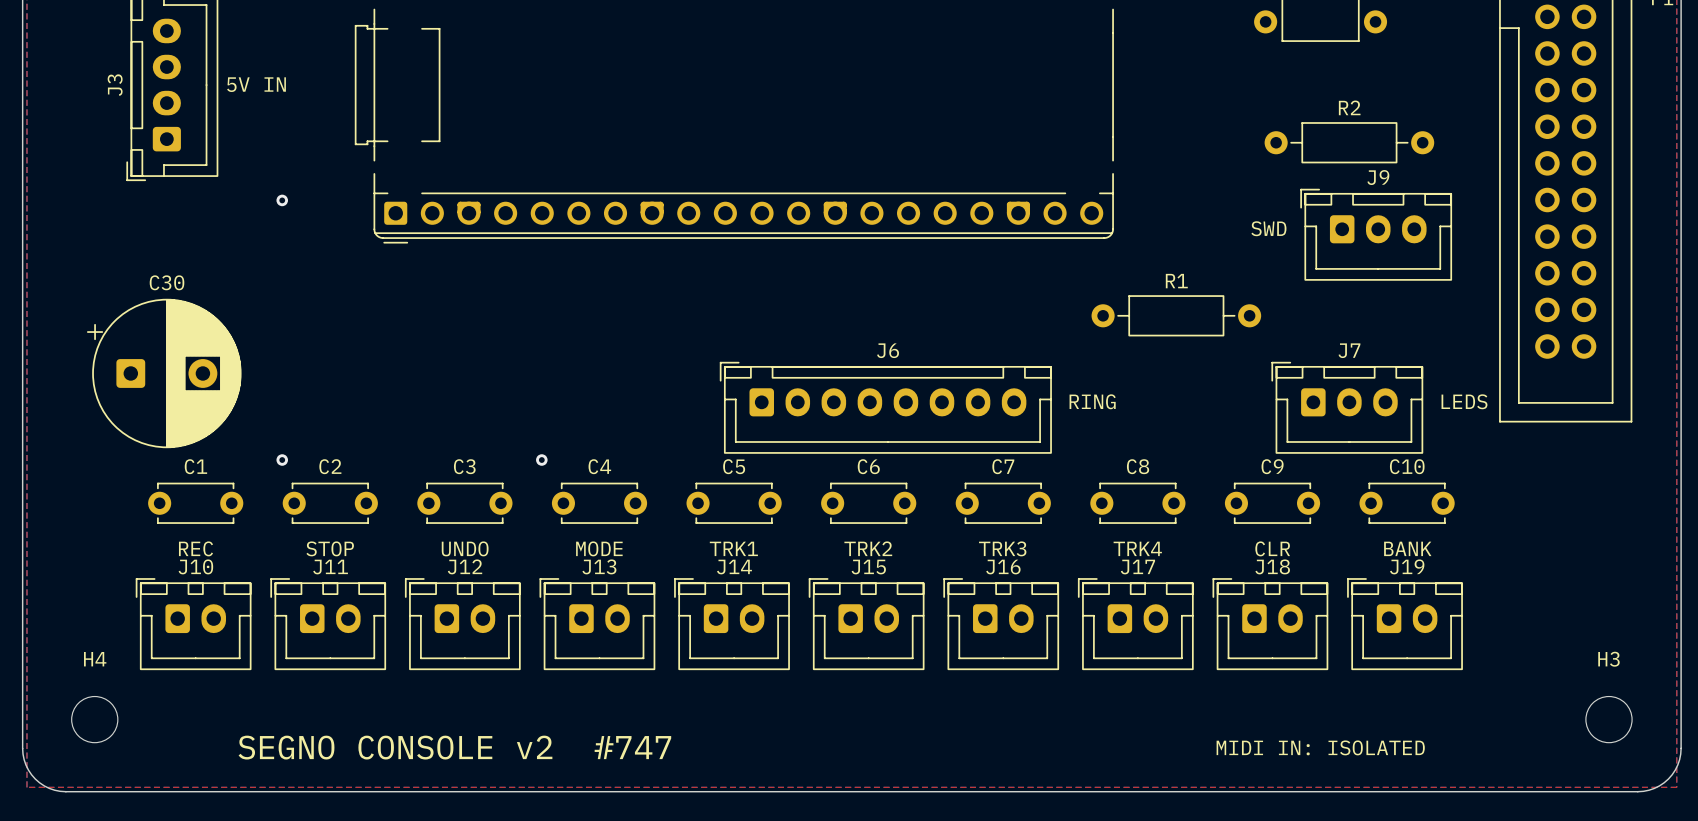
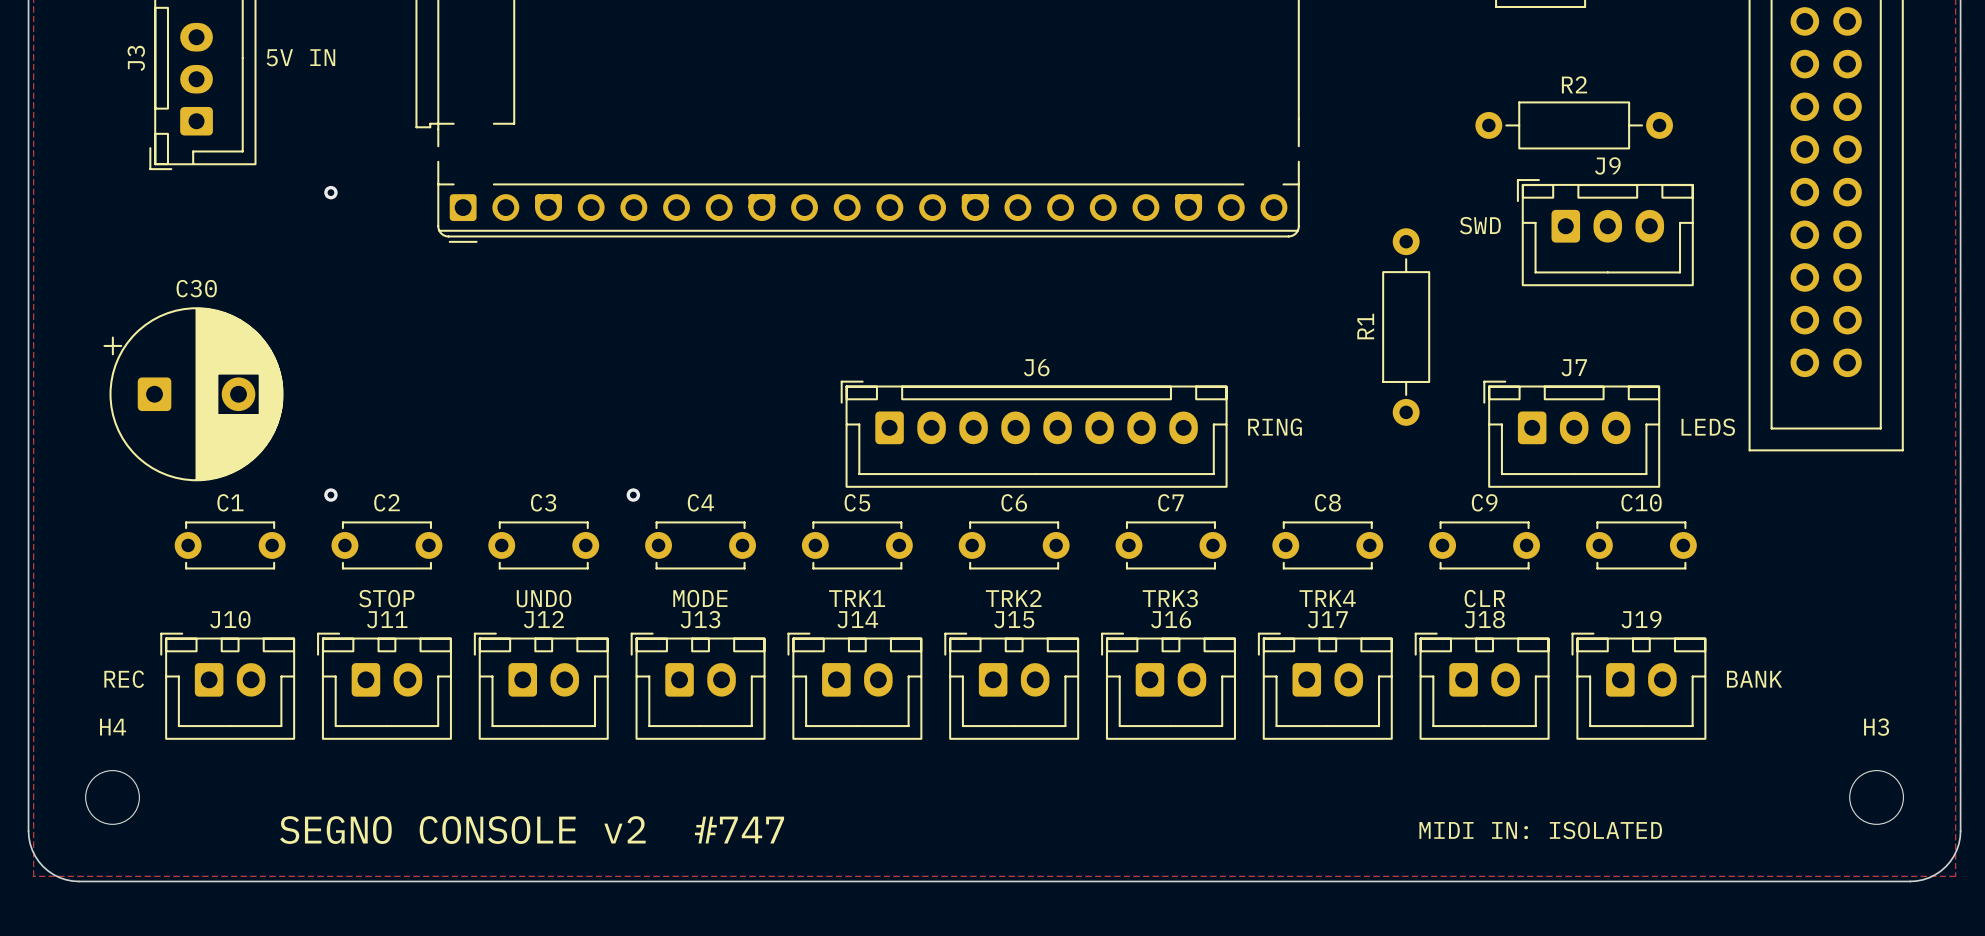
R1 name position: R1 (1176, 281) -> R1 (1365, 326)
R1 rotation: 0° (1176, 315) -> 90° clockwise (1406, 327)
text position: REC (195, 548) -> REC (124, 679)
text position: BANK (1407, 548) -> BANK (1754, 679)

